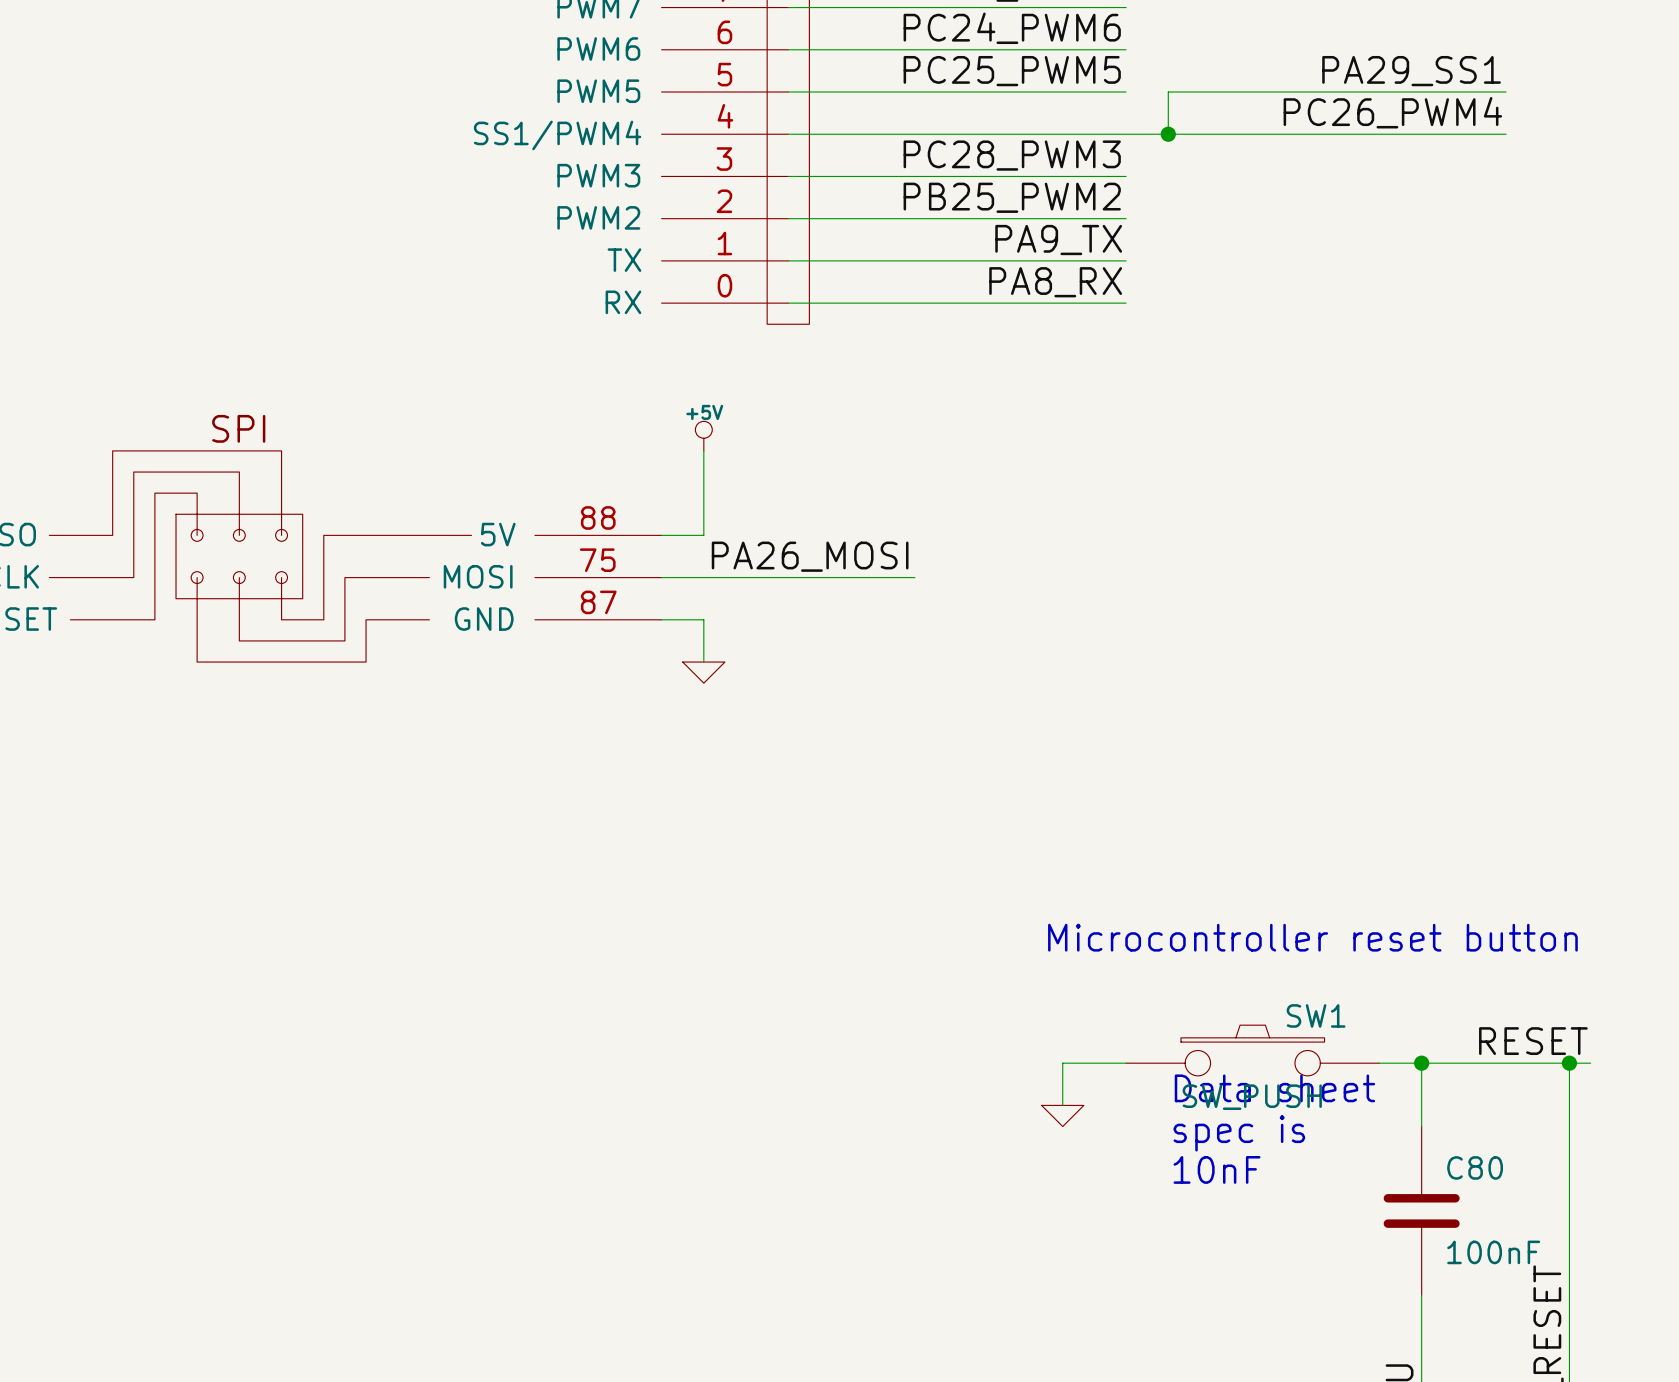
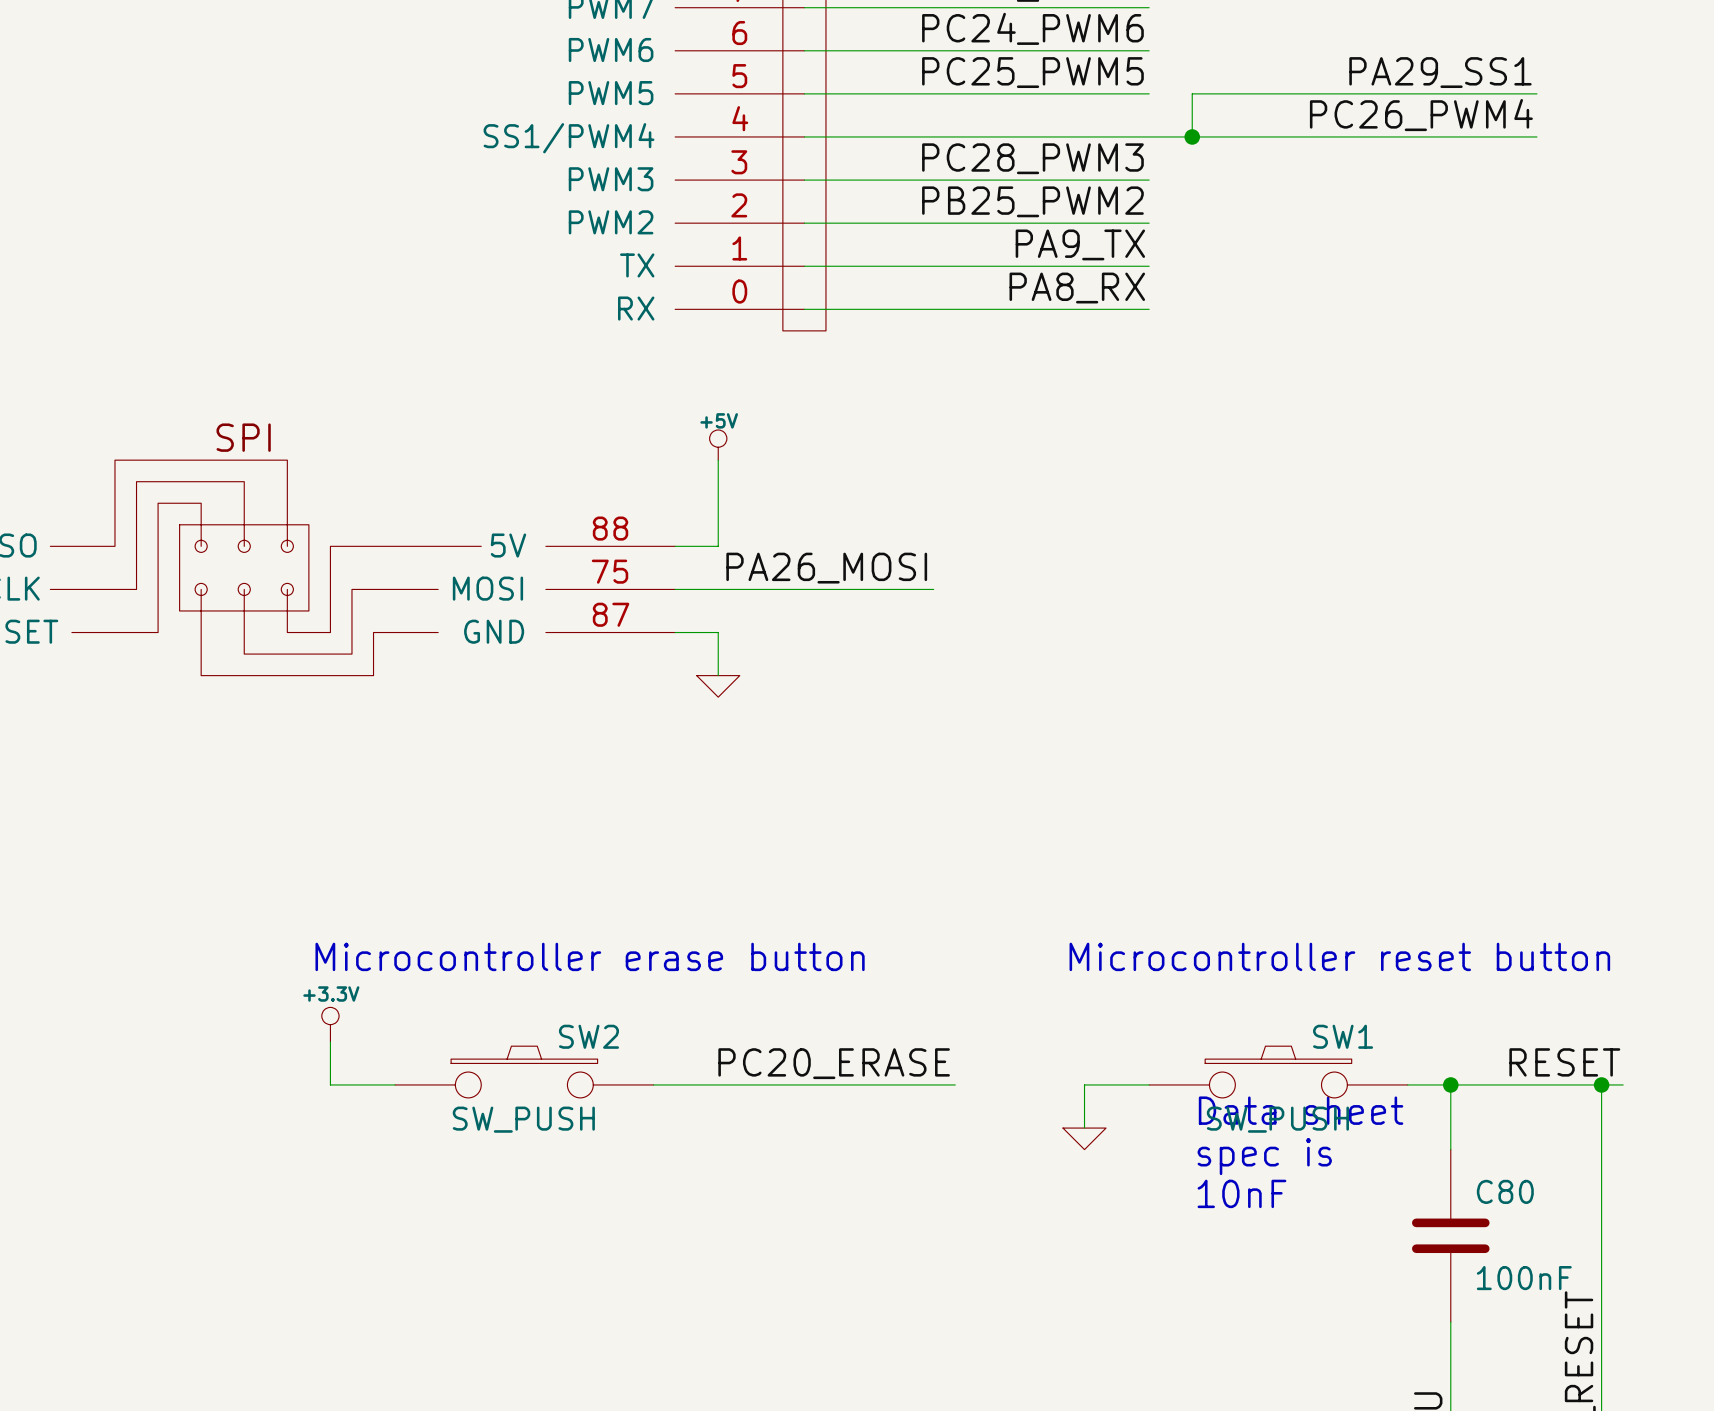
text: none -> Microcontroller erase button (590, 956)
power symbol: none -> +3.3V (330, 1024)
wire: none -> (330, 1041) (330, 1084) (395, 1084)
label: none -> PC20_ERASE (834, 1063)
SW2: none -> SW_PUSH (524, 1072)
wire: none -> (653, 1084) (955, 1084)

